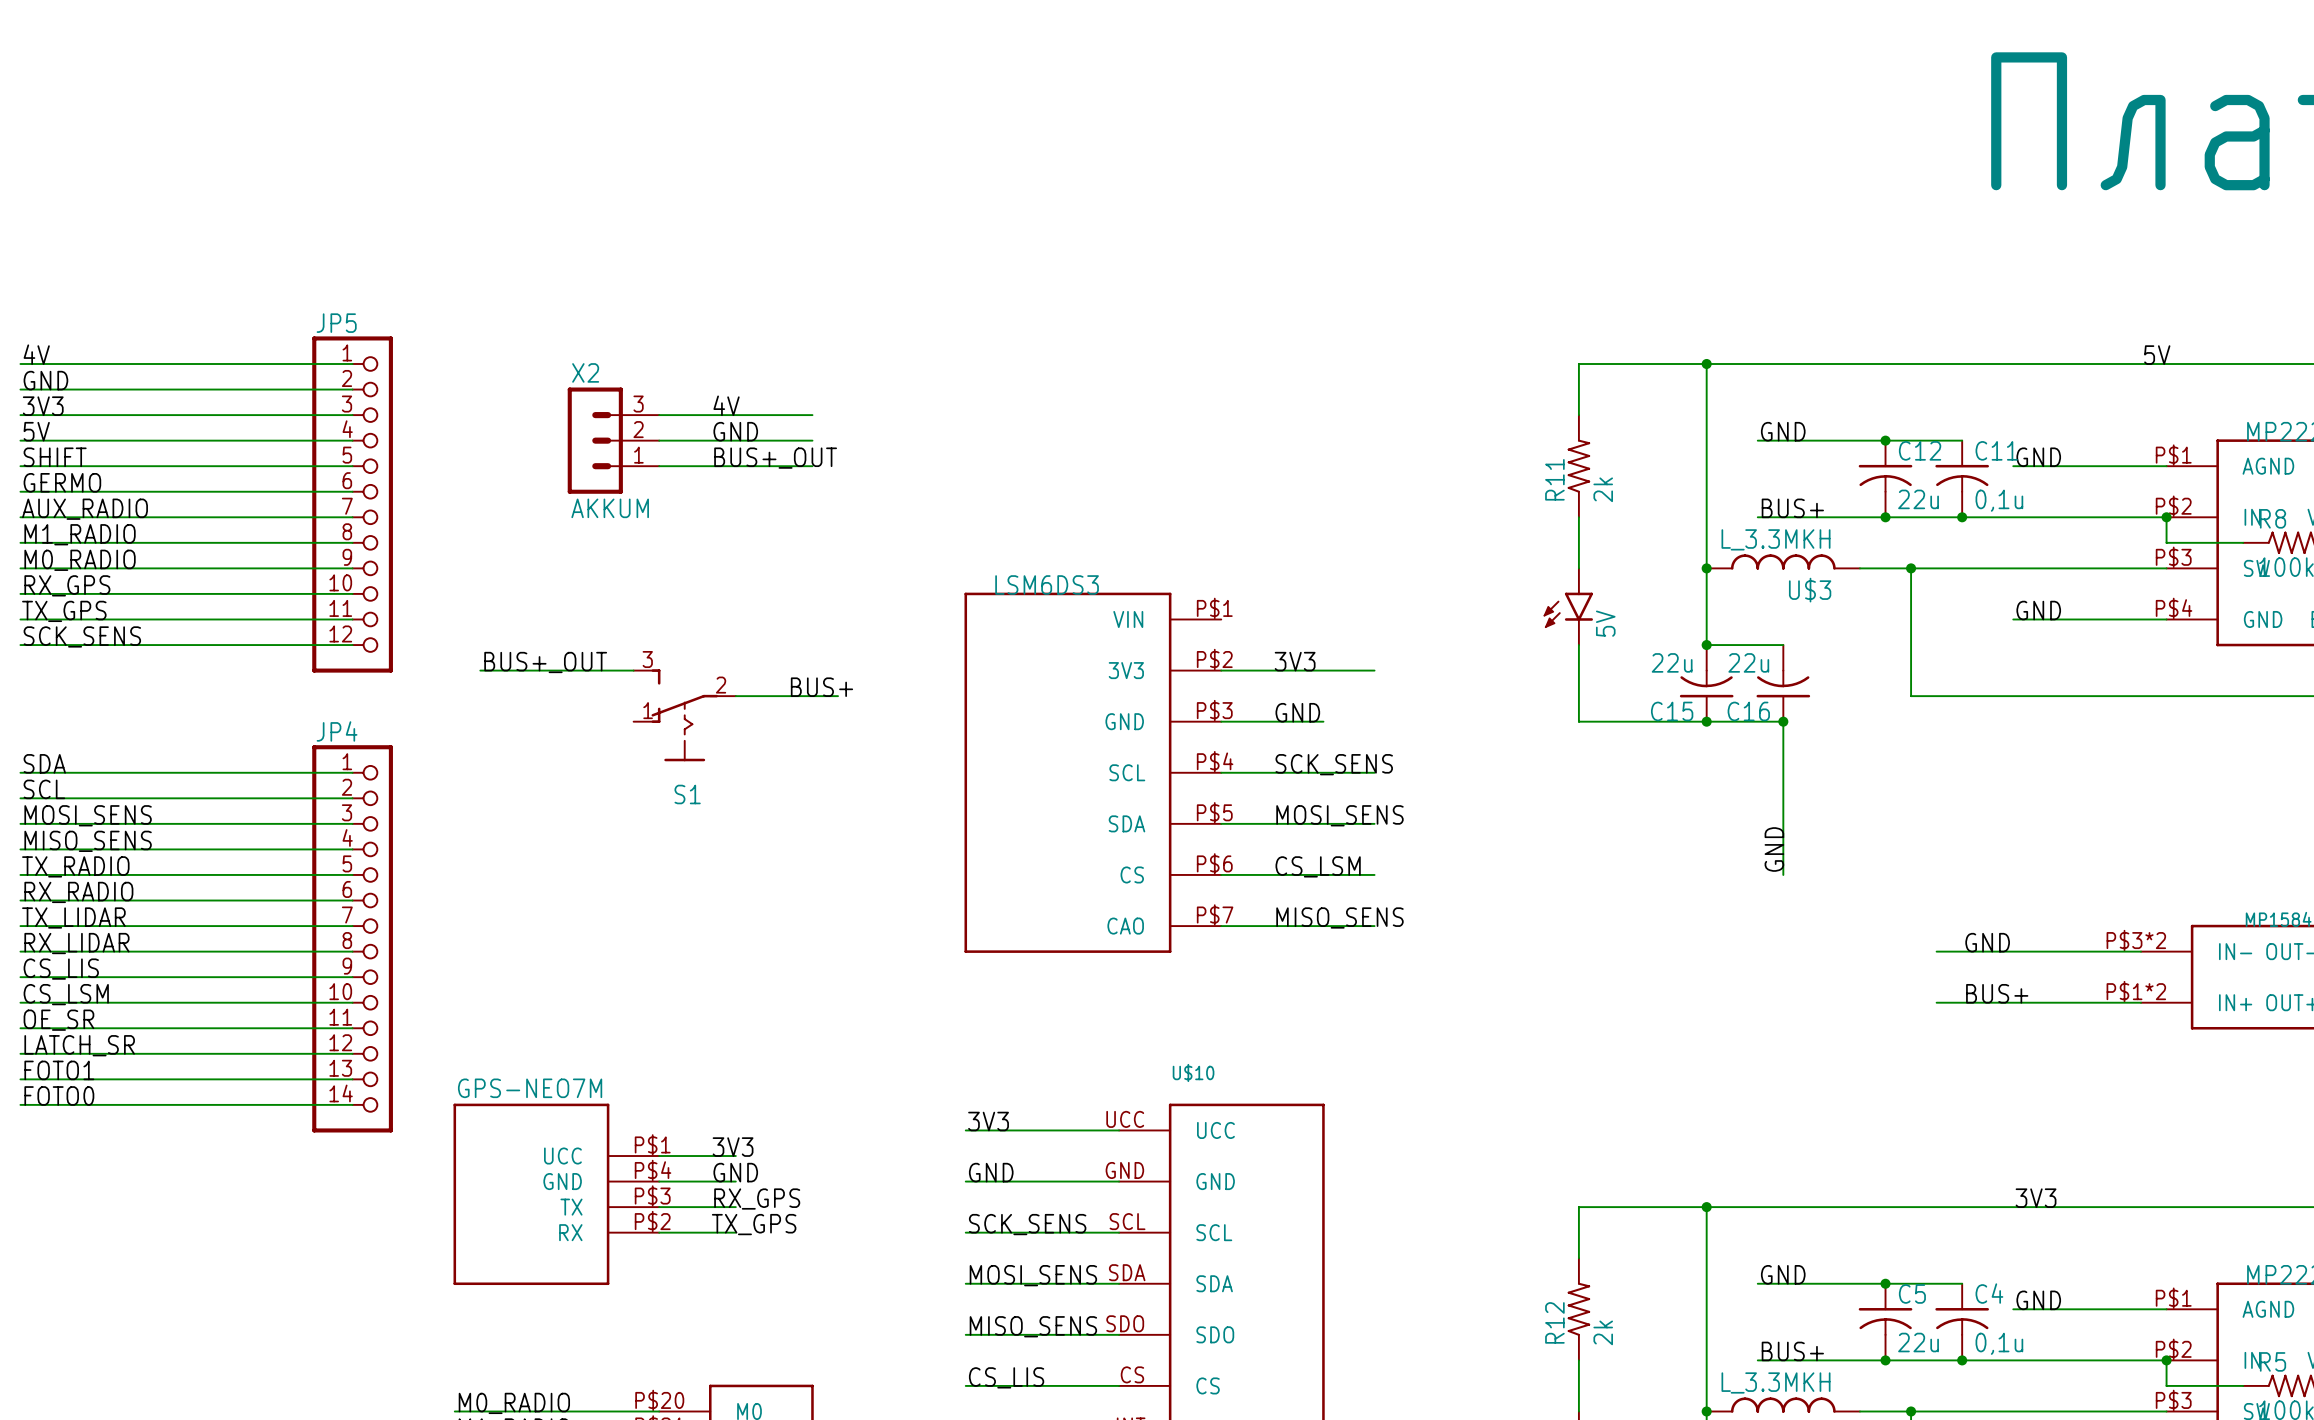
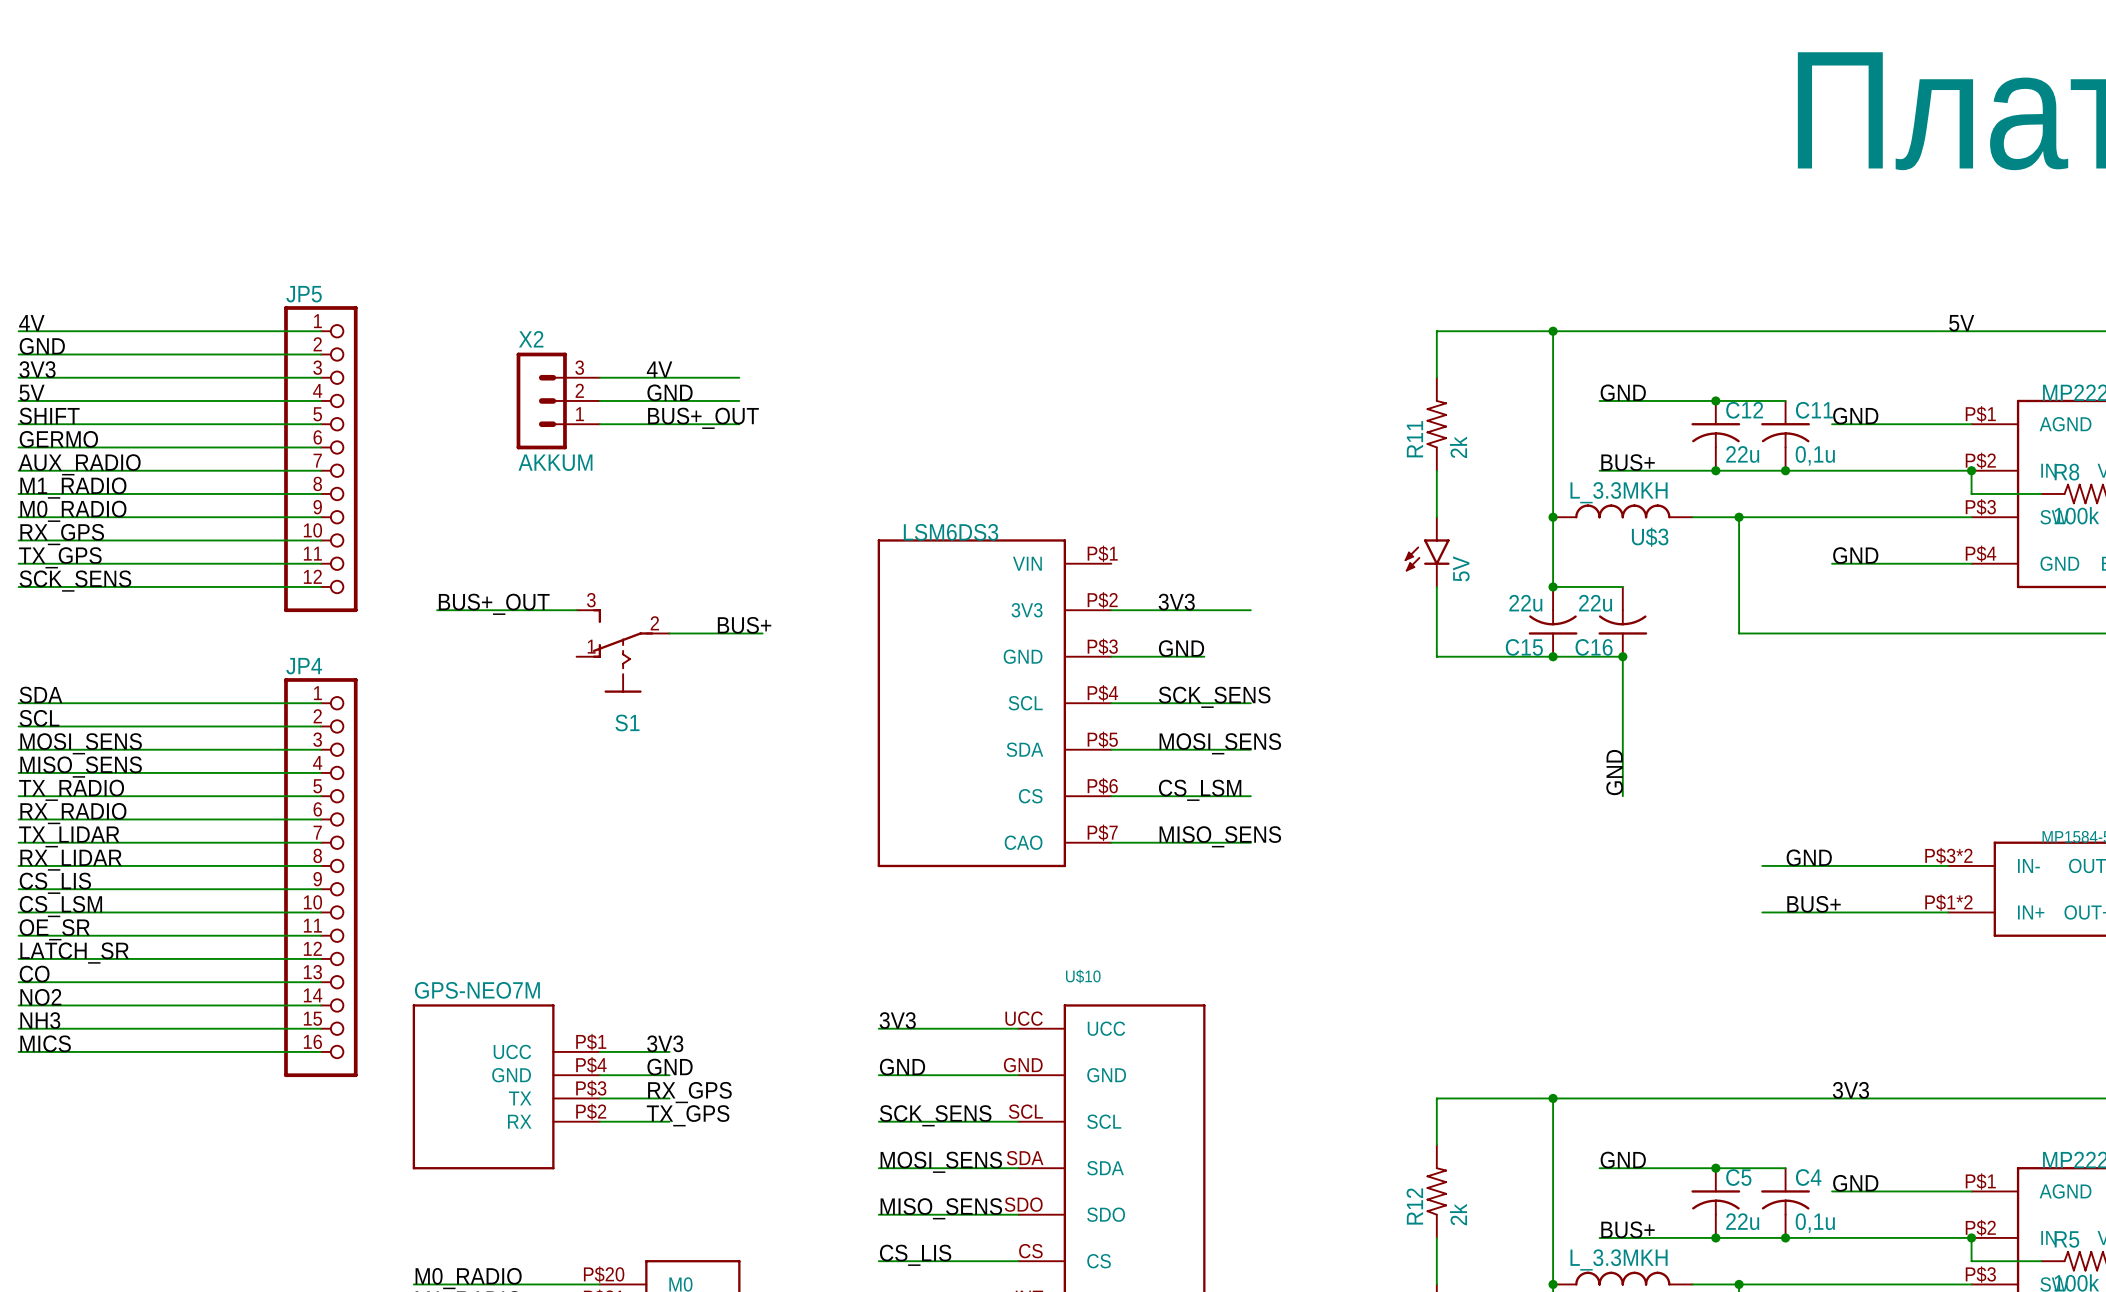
JP4 symbol: [312, 745, 393, 1133] -> [284, 678, 358, 1078]
label: FOTO1 (59, 1070) -> CO (34, 974)
label: FOTO0 (59, 1095) -> NO2 (40, 997)
label: none -> NH3 (40, 1020)
wire: none -> (18, 1028) (320, 1028)
label: none -> MICS (45, 1043)
wire: none -> (18, 1051) (320, 1051)

